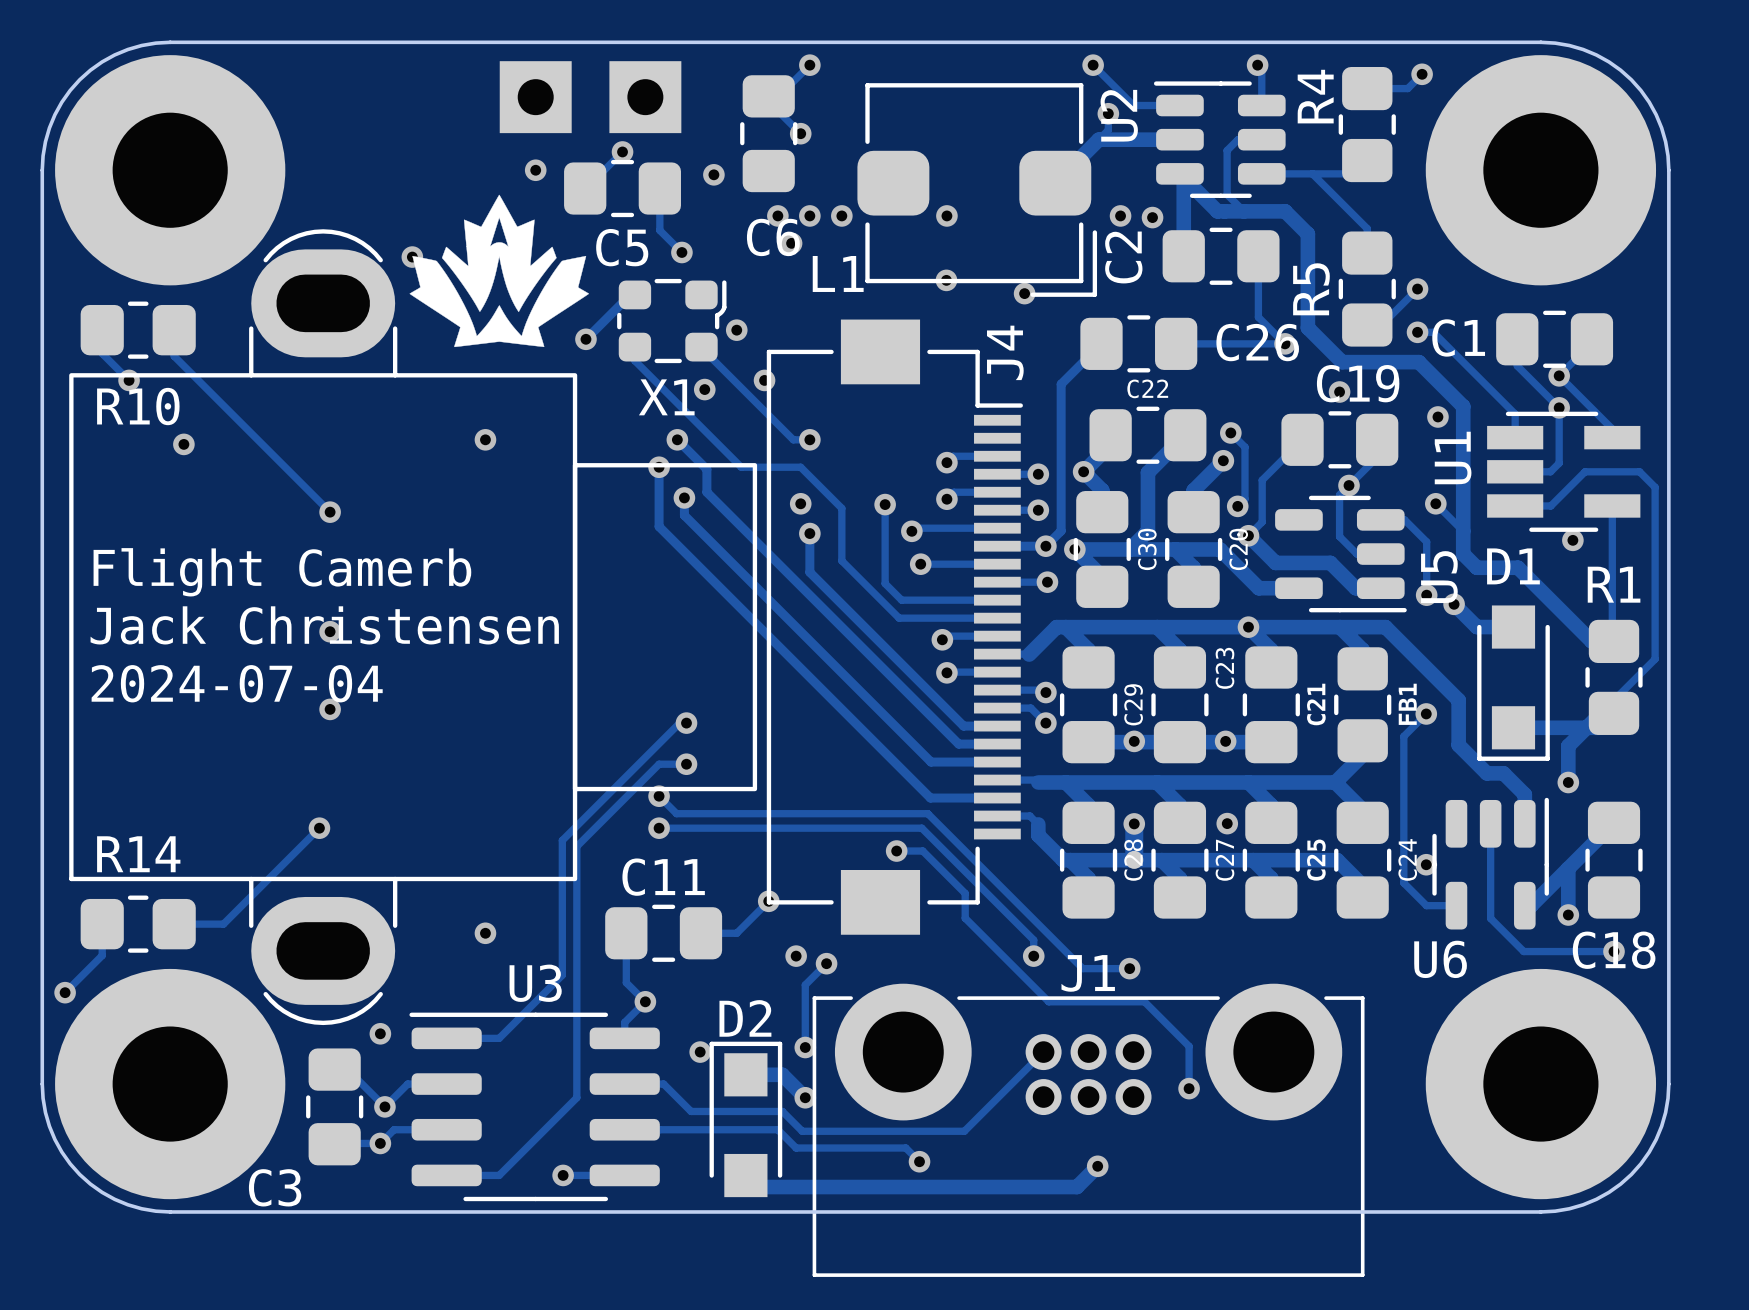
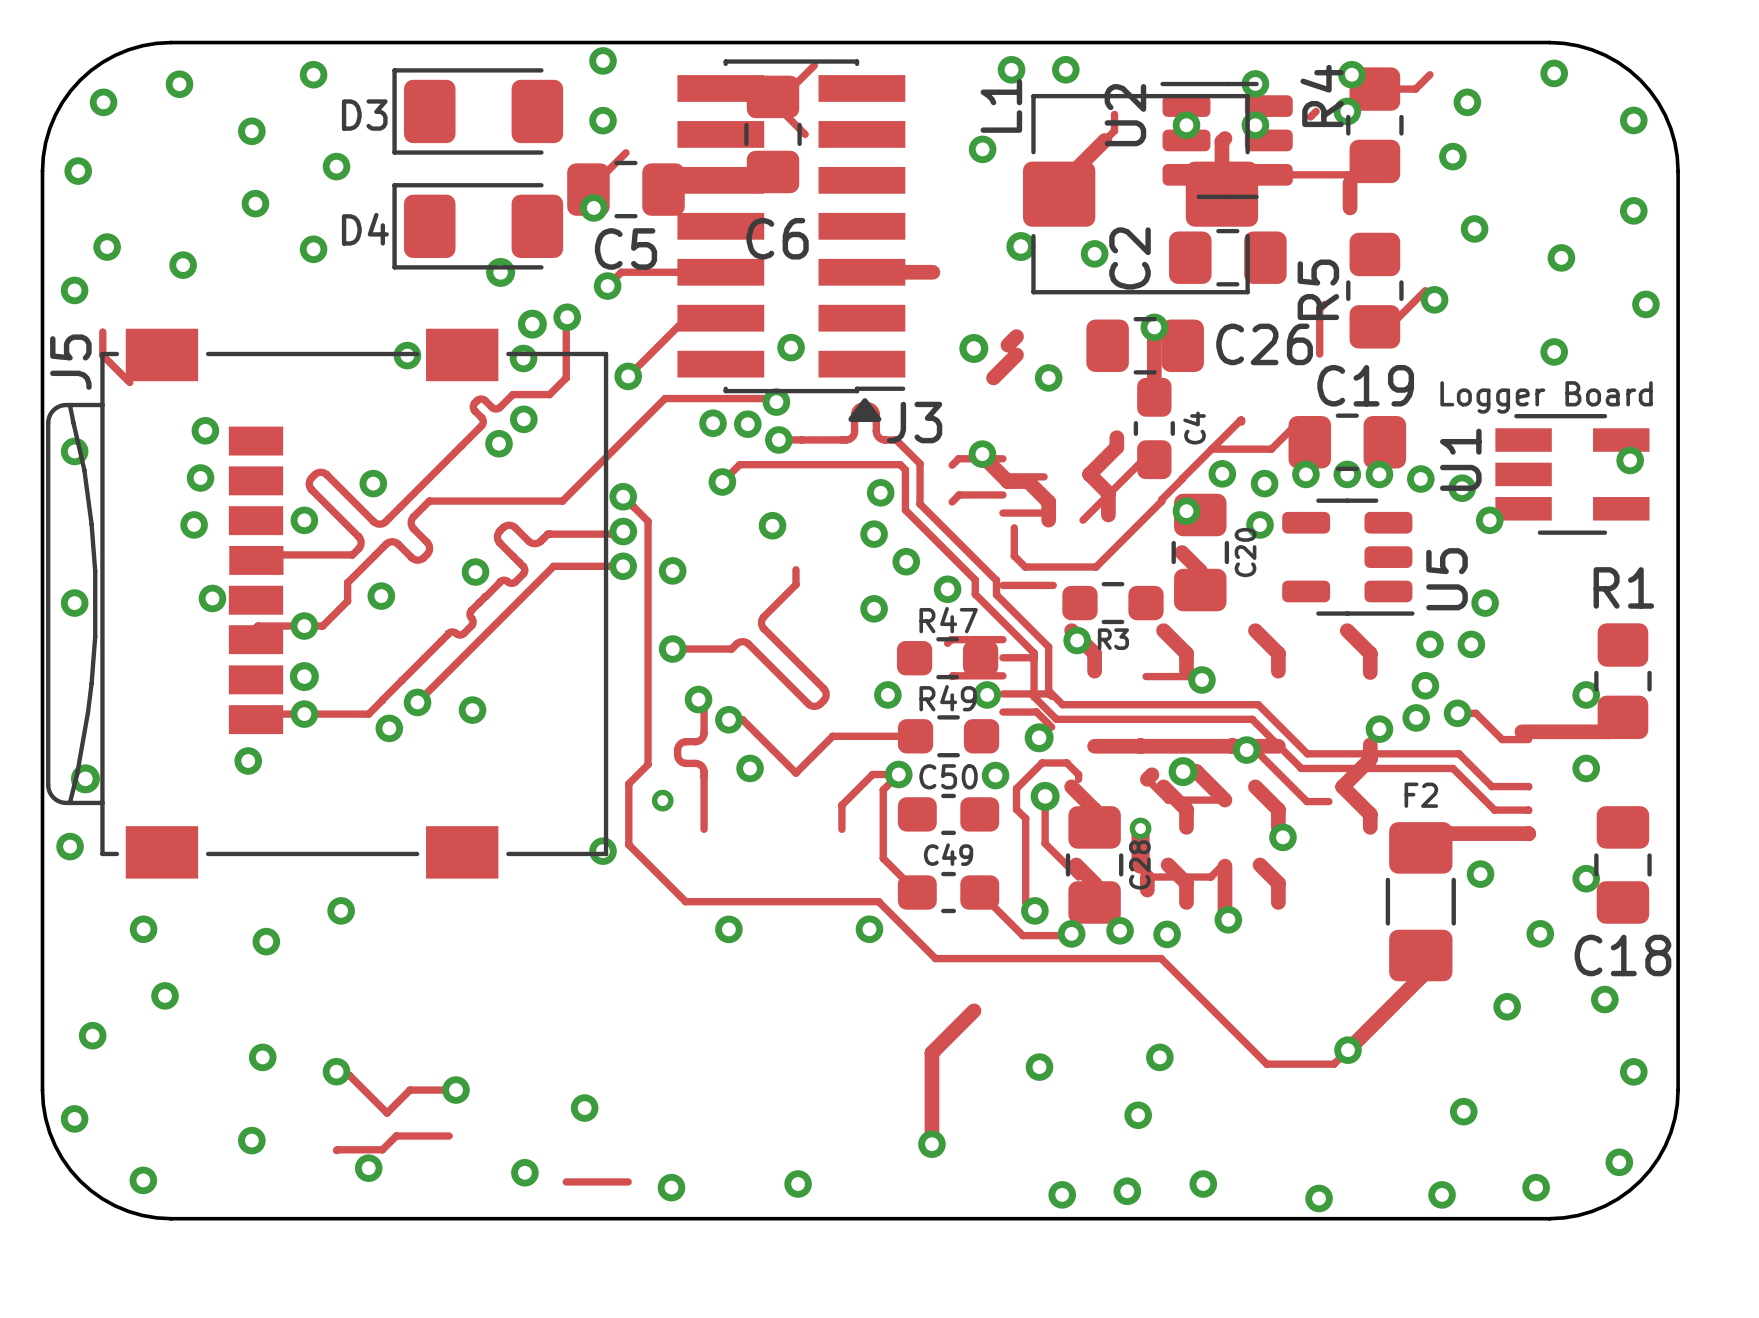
via: none -> (603, 60)
via: (809, 65) -> none
track: (1093, 65) (1133, 105) (1179, 105) -> none
via: (1093, 65) -> none
track: (1257, 65) (1261, 69) (1261, 105) -> none
via position: (1257, 65) -> (1255, 83)
via: none -> (1011, 69)
via: none -> (1065, 69)
via: none -> (1554, 73)
via: none -> (313, 74)
via: none -> (1351, 74)
via: (1422, 74) -> none
via: none -> (179, 84)
L1 footprint: [857, 83, 1098, 297] -> [1022, 93, 1259, 295]
part: (535, 97) -> none
part: (645, 97) -> none
via: none -> (103, 102)
via: none -> (1467, 102)
D3: none -> (477, 111)
track: none -> (1316, 111) (1310, 117)
via: none -> (1347, 111)
via: (1108, 113) -> none
via: none -> (603, 120)
via: none -> (1633, 120)
via: none -> (1186, 125)
via: none -> (1255, 125)
via: none -> (251, 131)
via: (800, 133) -> none
track: none -> (1224, 138) (1221, 141) (1221, 194)
track: (1098, 139) (1179, 139) -> none
track: (1261, 139) (1237, 139) (1227, 150) (1227, 194) (1243, 211) -> none
via: none -> (982, 149)
via: (622, 151) -> none
via: none -> (1452, 156)
via: none -> (336, 166)
via: none -> (78, 171)
part: (170, 170) -> none
via: (535, 170) -> none
part: (1540, 170) -> none
track: (1179, 173) (1217, 211) (1285, 211) (1307, 234) (1307, 327) (1342, 362) (1418, 362) (1463, 406) (1463, 554) (1476, 567) (1518, 567) (1591, 641) (1614, 641) (1612, 639) (1612, 505) -> none
track: (1312, 173) (1367, 228) (1367, 253) -> none
via: (713, 174) -> none
track: (1183, 177) (1183, 256) -> none
track: none -> (1350, 183) (1350, 207)
track: (659, 188) (659, 230) (681, 252) -> none
drawing: [409, 194, 589, 348] -> none
via: none -> (255, 203)
via: none -> (593, 207)
via: none -> (1633, 210)
via: (777, 215) -> none
via: (809, 215) -> none
via: (841, 215) -> none
via: (946, 215) -> none
via: (1120, 215) -> none
via: (1152, 217) -> none
D4: none -> (477, 226)
J3: none -> (791, 226)
via: none -> (1474, 228)
via: (791, 243) -> none
via: none -> (107, 247)
via: none -> (1020, 246)
via: none -> (313, 249)
via: (681, 252) -> none
via: none -> (1094, 253)
track: (1258, 256) (1258, 317) (1285, 343) (1176, 343) -> none
via: none -> (1561, 257)
via: (412, 257) -> none
via: none -> (183, 265)
via: none -> (500, 272)
track: none -> (720, 272) (621, 272) (607, 286)
track: none -> (861, 272) (932, 272)
L1 name position: L1 (838, 273) -> L1 (1001, 106)
via: (946, 280) -> none
via: none -> (607, 286)
via: none -> (74, 290)
via position: (1417, 289) -> (1434, 299)
via: (1024, 293) -> none
track: (634, 294) (630, 294) (585, 339) -> none
track: none -> (1324, 304) (1319, 309) (1319, 354)
via: none -> (1645, 304)
track: none -> (567, 317) (566, 377) (549, 394) (512, 394) (497, 408) (492, 408) (483, 399) (477, 400) (473, 408) (482, 419) (482, 425) (384, 522) (379, 524) (374, 522) (325, 473) (317, 472) (311, 477) (309, 483) (311, 489) (360, 539) (360, 546) (352, 554) (261, 554) (256, 560)
track: none -> (720, 318) (686, 318) (628, 376)
X1: (671, 321) -> none
via: none -> (532, 324)
track: none -> (1154, 327) (1154, 397)
via: none -> (1154, 327)
R10: (138, 330) -> none
track: (174, 330) (174, 356) (330, 512) -> none
via: (736, 330) -> none
track: (1417, 332) (1433, 332) (1515, 414) (1515, 437) -> none
via: (1417, 332) -> none
track: none -> (1016, 336) (1007, 345)
via position: (585, 339) -> (567, 317)
track: (1517, 339) (1517, 365) (1559, 407) (1559, 463) (1550, 471) (1515, 471) -> none
C1: (1554, 339) -> none
track: (1591, 339) (1591, 343) (1559, 375) (1612, 428) (1612, 437) -> none
track: (1101, 343) (1061, 384) (1061, 530) (1045, 546) (997, 546) -> none
via: (1285, 343) -> none
via: none -> (791, 347)
via: none -> (973, 348)
track: (634, 347) (634, 360) (741, 467) (800, 467) (841, 508) (841, 560) (899, 618) (997, 618) -> none
track: (701, 347) (793, 439) (809, 439) -> none
via: none -> (1554, 351)
track: none -> (1016, 354) (993, 377)
via: none -> (407, 355)
via: none -> (523, 358)
via: none -> (628, 376)
via: none -> (1048, 377)
via: (1559, 375) -> none
via: (129, 380) -> none
via position: (764, 380) -> (776, 402)
via: (704, 389) -> none
via: (1339, 391) -> none
text: none -> Logger Board (1546, 397)
drawing: none -> [848, 398, 882, 423]
track: none -> (776, 402) (772, 398) (665, 398) (562, 501) (429, 501) (413, 517) (411, 521) (413, 528) (429, 545) (428, 552) (423, 558) (414, 559) (397, 543) (388, 542) (347, 582) (347, 601) (322, 626) (257, 626) (256, 627) (256, 639)
via: (1559, 407) -> none
via: (1437, 416) -> none
via: none -> (523, 419)
track: none -> (1319, 420) (1300, 420) (1271, 449) (1211, 449)
track: none -> (1241, 422) (1240, 420) (1182, 478)
via: none -> (713, 423)
via: none -> (747, 424)
C4: none -> (1154, 428)
via size: [474, 429, 497, 451] -> [485, 429, 513, 458]
track: (1377, 429) (1377, 457) (1339, 494) (1339, 536) (1356, 554) (1380, 554) -> none
track: (1230, 432) (1245, 447) (1245, 499) (1237, 506) -> none
via: (1230, 432) -> none
C22: (1147, 435) -> none
track: (1185, 435) (1147, 472) (1147, 531) (1129, 549) -> none
track: none -> (778, 439) (848, 439) (854, 433) (856, 409) (863, 405) (873, 408) (876, 413) (878, 436) (883, 439) (896, 439) (920, 463) (920, 504) (996, 580) (996, 594) (1048, 646) (1048, 690) (1062, 704) (1258, 704) (1307, 753) (1459, 753) (1491, 786) (1528, 786)
via: none -> (778, 439)
track: (677, 439) (706, 469) (706, 492) (958, 744) (997, 744) -> none
via: (677, 439) -> none
via: (809, 439) -> none
track: (1302, 439) (1262, 480) (1262, 522) (1248, 535) (1275, 562) (1330, 562) (1355, 588) (1380, 588) -> none
via position: (183, 444) -> (205, 430)
via: none -> (74, 451)
track: none -> (982, 454) (1007, 481) (1028, 481) (1048, 502) (1048, 520)
via: none -> (982, 454)
track: none -> (1154, 459) (1143, 459) (1083, 520)
via: none -> (1630, 460)
track: (1223, 460) (1193, 490) (1193, 512) -> none
via position: (1223, 460) -> (1222, 473)
via: (946, 462) -> none
track: (659, 467) (659, 526) (930, 798) (997, 798) -> none
via: (659, 467) -> none
via: (1083, 471) -> none
via: none -> (1305, 474)
via: none -> (1347, 474)
via: none -> (1379, 474)
via: (1038, 474) -> none
via: none -> (200, 477)
track: none -> (1182, 478) (1096, 567) (1025, 567) (1014, 556) (1014, 527)
via: none -> (1420, 479)
track: none -> (722, 481) (739, 464) (900, 464) (905, 469) (905, 510) (975, 579) (975, 594) (1034, 653) (1034, 696) (1056, 719) (1252, 719) (1301, 768) (1452, 768) (1494, 810) (1528, 810)
via: none -> (722, 481)
via: none -> (373, 483)
via: none -> (1264, 483)
via: (1349, 485) -> none
track: none -> (623, 496) (648, 521) (648, 764) (628, 783) (628, 844) (685, 901) (878, 901) (935, 958) (1161, 958) (1266, 1064) (1333, 1064) (1420, 977) (1420, 955)
via: none -> (623, 496)
track: (684, 497) (684, 515) (931, 762) (997, 762) -> none
via: (684, 497) -> none
via: (946, 499) -> none
via: (800, 503) -> none
track: (1435, 503) (1463, 531) -> none
via position: (1435, 503) -> (1462, 488)
track: (885, 504) (885, 583) (901, 600) (997, 600) -> none
via position: (885, 504) -> (880, 492)
track: (1515, 505) (1550, 505) (1585, 471) (1639, 471) (1655, 487) (1655, 659) (1614, 700) (1614, 713) (1600, 713) (1568, 746) (1568, 782) -> none
via: (1237, 506) -> none
via: none -> (1186, 511)
via: (1038, 510) -> none
via: (330, 512) -> none
via: none -> (304, 520)
via: none -> (1489, 520)
track: (1380, 519) (1404, 519) (1426, 541) (1426, 595) -> none
via: none -> (194, 524)
via: none -> (772, 525)
via: none -> (1260, 524)
track: none -> (623, 531) (620, 534) (547, 534) (540, 541) (534, 543) (529, 541) (513, 526) (506, 525) (498, 532) (498, 540) (523, 566) (524, 570) (514, 582) (504, 580) (500, 581)
via: none -> (623, 531)
track: (997, 528) (914, 528) (911, 531) -> none
via: none -> (874, 534)
via: (911, 531) -> none
track: (809, 533) (809, 572) (963, 726) (997, 726) -> none
via: (809, 533) -> none
via: (1248, 535) -> none
via: (1572, 540) -> none
via: (1045, 546) -> none
via: (1074, 549) -> none
C30: (1102, 549) -> none
via: none -> (906, 561)
track: none -> (623, 566) (553, 566) (417, 702)
via: none -> (623, 566)
track: (920, 564) (997, 564) -> none
via: (920, 564) -> none
track: none -> (795, 569) (795, 584) (763, 617) (761, 623) (764, 628) (824, 689) (825, 697) (818, 705) (809, 704) (745, 642) (739, 642) (731, 649) (672, 649)
via: none -> (672, 570)
via: none -> (475, 572)
text: Flight Camerb (282, 572) -> none
track: none -> (500, 582) (485, 596)
via: (1047, 582) -> none
via: none -> (947, 589)
track: (1102, 586) (1102, 576) (1074, 549) (1220, 549) (1258, 588) (1298, 588) -> none
via: none -> (381, 596)
track: none -> (485, 596) (470, 611) (472, 623) (463, 633) (459, 635) (452, 631) (448, 633)
via: none -> (212, 598)
via: (1426, 595) -> none
via: none -> (74, 603)
R3: none -> (1112, 603)
J5: none -> (327, 603)
track: (1454, 604) (1476, 627) (1513, 627) -> none
via position: (1454, 604) -> (1485, 603)
via: none -> (874, 608)
via: none -> (304, 626)
text: Jack Christensen (324, 625) -> none
part: (413, 627) -> none
J4: (894, 627) -> none
via: (1248, 627) -> none
track: none -> (448, 633) (382, 699)
via: (330, 631) -> none
via: none -> (1077, 640)
via: (942, 639) -> none
via: none -> (1429, 644)
via: none -> (1471, 644)
via: none -> (672, 649)
R47: none -> (947, 658)
track: (1029, 654) (1056, 627) (1385, 627) (1458, 700) (1458, 745) (1486, 773) (1503, 773) (1524, 794) (1524, 823) -> none
via: none -> (304, 676)
via: (946, 672) -> none
track: none -> (1145, 676) (1198, 676) (1202, 680)
via: none -> (1202, 680)
via: none -> (1425, 685)
text: 2024-07-04 (237, 683) -> none
D1: (1513, 683) -> none
via: none -> (887, 694)
via: none -> (987, 694)
via: none -> (1586, 694)
via: (1045, 692) -> none
track: none -> (698, 699) (704, 705) (703, 735) (698, 741) (680, 743) (678, 747) (677, 754) (681, 762) (698, 763) (703, 769) (704, 829)
via: none -> (698, 699)
track: none -> (382, 700) (368, 714) (261, 714) (256, 719)
via: none -> (417, 702)
C29: (1088, 704) -> none
C23: (1179, 704) -> none
C21: (1271, 704) -> none
FB1: (1362, 704) -> none
via: none -> (472, 710)
via: (330, 709) -> none
track: none -> (1457, 713) (1475, 713) (1502, 739) (1528, 739)
via: none -> (1457, 713)
via: none -> (304, 714)
via: none -> (1416, 717)
track: (1426, 713) (1403, 736) (1403, 883) (1426, 905) (1456, 905) -> none
via: (1426, 713) -> none
track: none -> (728, 719) (742, 719) (795, 773) (832, 736) (915, 736)
via: none -> (728, 719)
track: (686, 723) (679, 723) (562, 840) (562, 975) (499, 1038) (446, 1038) -> none
via: (686, 723) -> none
via position: (1045, 723) -> (1039, 737)
via: none -> (389, 728)
via: none -> (1379, 729)
R49: none -> (948, 736)
via: (1134, 741) -> none
via position: (1225, 741) -> (1246, 750)
track: none -> (1246, 750) (1255, 750) (1306, 801) (1328, 801)
via: none -> (248, 760)
track: (686, 764) (659, 764) (576, 846) (576, 1097) (499, 1175) (446, 1175) -> none
via: (686, 764) -> none
via: none -> (750, 768)
track: none -> (1183, 771) (1196, 771) (1224, 800) (1168, 800) (1147, 779) (1151, 774)
via: none -> (1183, 771)
via: none -> (898, 774)
via: none -> (995, 775)
via: none -> (85, 778)
track: none -> (1078, 779) (1078, 774) (1066, 762) (1042, 762) (1016, 788) (1016, 809) (1025, 818) (1025, 901) (1034, 910)
track: (997, 780) (1035, 780) (1038, 782) (1335, 782) -> none
via position: (1568, 782) -> (1586, 768)
track: none -> (1045, 796) (1045, 843) (1078, 877)
via: none -> (1045, 796)
track: (659, 796) (676, 813) (927, 813) (1082, 968) (1129, 968) -> none
C50: none -> (948, 814)
track: (997, 816) (1029, 816) (1038, 824) (1038, 835) (1063, 860) (1337, 860) (1362, 885) (1362, 897) -> none
track: (1614, 822) (1531, 905) (1524, 905) -> none
via: (1227, 823) -> none
track: (1490, 823) (1490, 918) (1523, 951) (1614, 951) -> none
track: none -> (841, 829) (841, 805) (872, 774) (898, 774) (883, 790) (883, 858) (917, 892)
track: (319, 828) (223, 924) (174, 924) -> none
via: (319, 828) -> none
track: (659, 828) (921, 828) (1033, 940) (1033, 956) -> none
via: (659, 828) -> none
track: none -> (1528, 833) (1435, 833) (1420, 847)
via: none -> (1282, 837)
via: none -> (70, 846)
via: none -> (603, 851)
track: (896, 851) (922, 851) (965, 893) (965, 918) (1048, 1001) (1144, 1001) (1189, 1046) (1189, 1088) -> none
via: (896, 851) -> none
C27: (1179, 860) -> none
C25: (1271, 860) -> none
C24: (1362, 860) -> none
U6: (1490, 863) -> none
via: (1426, 864) -> none
via: none -> (1480, 874)
track: (1568, 869) (1568, 915) -> none
via: none -> (1586, 878)
track: none -> (1147, 890) (1147, 877) (1210, 877) (1221, 866) (1224, 866) (1224, 916) (1228, 919)
C49: none -> (948, 892)
track: none -> (979, 892) (1022, 935) (1069, 935) (1071, 933)
F2: none -> (1420, 901)
track: (768, 901) (736, 933) (700, 933) -> none
via: (768, 901) -> none
via: none -> (341, 910)
via: none -> (1034, 910)
via: none -> (1228, 919)
via: (1568, 915) -> none
track: (102, 924) (102, 955) (65, 992) -> none
R14: (138, 924) -> none
via: none -> (143, 929)
via: none -> (728, 929)
via: none -> (869, 929)
via: none -> (1120, 930)
via: none -> (1071, 933)
via: none -> (1540, 933)
via: none -> (1167, 934)
via: (485, 933) -> none
track: (626, 933) (626, 982) (645, 1001) (624, 1022) (624, 1038) -> none
C11: (663, 933) -> none
via: none -> (266, 941)
via: (1614, 951) -> none
via: (796, 956) -> none
via: (1033, 956) -> none
track: (826, 963) (805, 984) (805, 1047) -> none
via: (826, 963) -> none
via: (1129, 968) -> none
via: none -> (165, 995)
via: (65, 992) -> none
via: none -> (1604, 999)
via: (645, 1001) -> none
via: none -> (1507, 1006)
track: none -> (974, 1010) (931, 1052) (931, 1144)
via: none -> (92, 1035)
via: (380, 1033) -> none
via: none -> (1347, 1050)
via: (805, 1047) -> none
via: none -> (262, 1057)
via: none -> (1159, 1057)
via: (700, 1052) -> none
track: (1043, 1052) (964, 1131) (802, 1131) (782, 1111) (691, 1111) (663, 1084) (624, 1084) -> none
via: none -> (1039, 1067)
via: none -> (336, 1071)
via: none -> (1633, 1071)
track: (745, 1074) (782, 1074) (805, 1097) -> none
part: (170, 1084) -> none
via: none -> (455, 1090)
part: (1540, 1084) -> none
via: (1189, 1088) -> none
via: (805, 1097) -> none
via: none -> (584, 1108)
via: none -> (1463, 1111)
C3: (334, 1106) -> none
via: (384, 1106) -> none
U3: (534, 1106) -> none
via: none -> (1138, 1115)
via: none -> (74, 1118)
D2: (745, 1119) -> none
track: (624, 1129) (777, 1129) (796, 1148) (905, 1148) (919, 1161) -> none
J1: (1088, 1130) -> none
via: none -> (251, 1140)
via position: (380, 1143) -> (368, 1168)
via: none -> (1619, 1162)
via position: (919, 1161) -> (931, 1144)
via: none -> (524, 1172)
track: (1097, 1166) (1076, 1187) (757, 1187) (745, 1175) -> none
via position: (1097, 1166) -> (1127, 1191)
via: none -> (143, 1180)
via: (563, 1175) -> none
via: none -> (798, 1184)
via: none -> (1203, 1184)
via: none -> (671, 1187)
via: none -> (1536, 1187)
via: none -> (1062, 1194)
via: none -> (1442, 1194)
via: none -> (1319, 1198)

